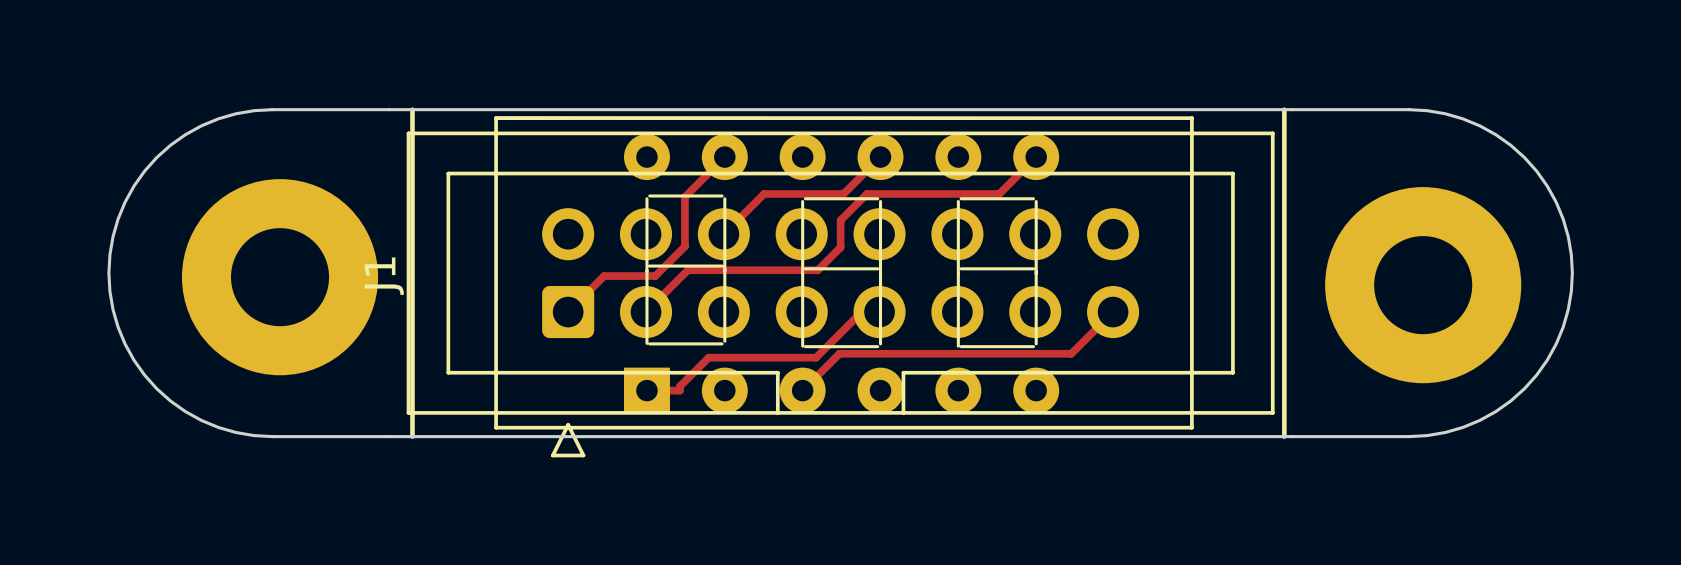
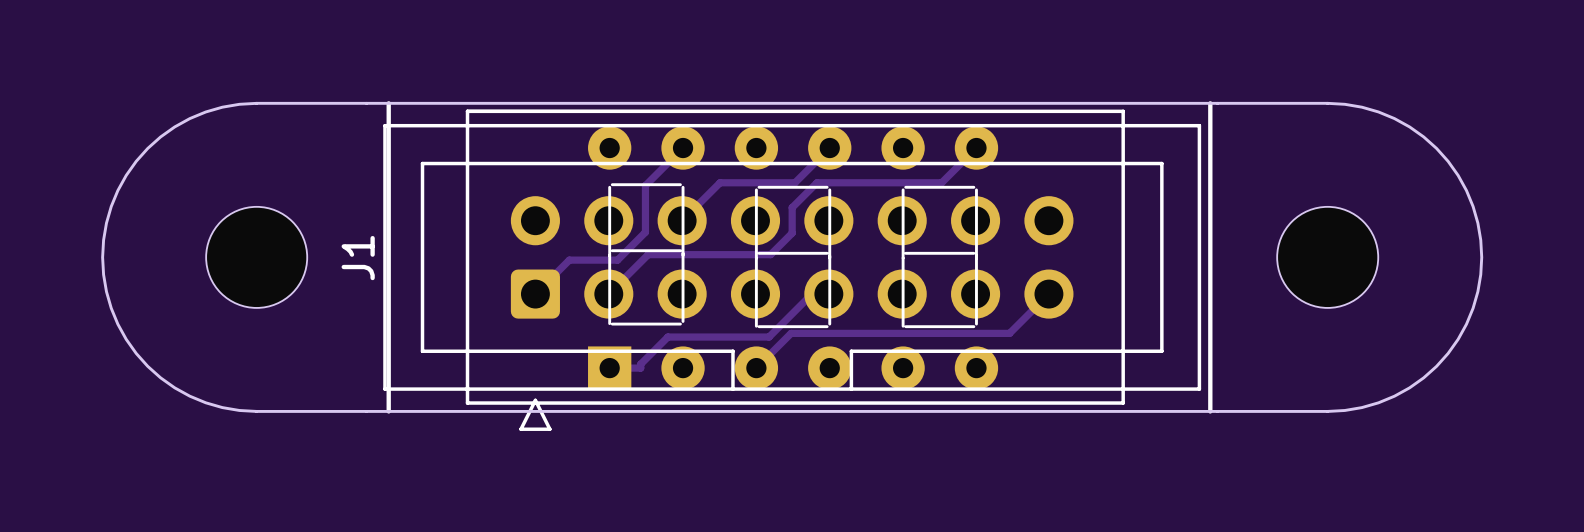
part footprint: [181, 179, 379, 376] -> [206, 206, 308, 308]
part footprint: [1325, 187, 1522, 384] -> [1277, 206, 1379, 308]

